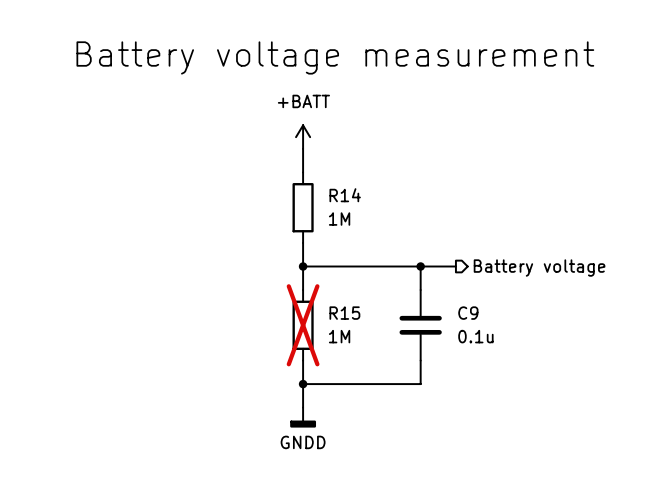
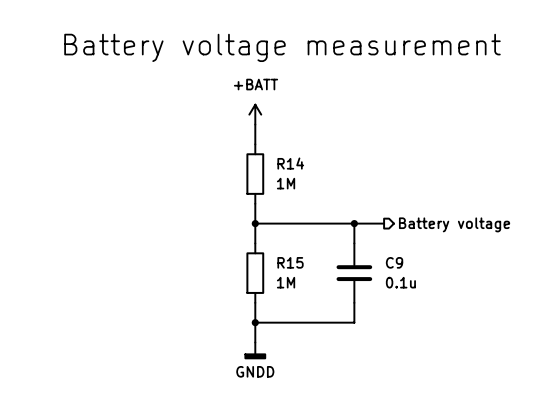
R15 do-not-place cross: (303, 325) -> none

